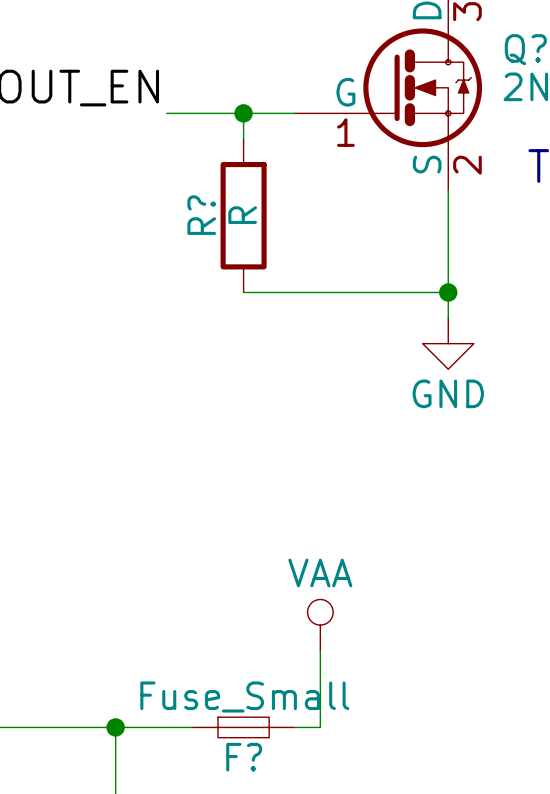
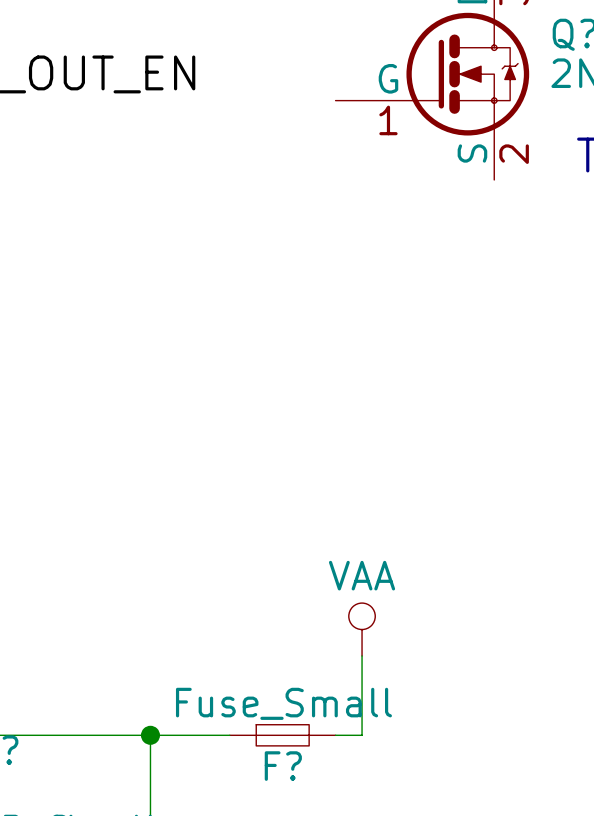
wire: (166, 113) (294, 113) -> none
wire: (243, 113) (243, 138) -> none
junction: (243, 113) -> none
wire: (448, 190) (448, 318) -> none
R?: R (243, 215) -> none
wire: (243, 292) (448, 292) -> none
junction: (448, 292) -> none
power symbol: GND (448, 343) -> none

